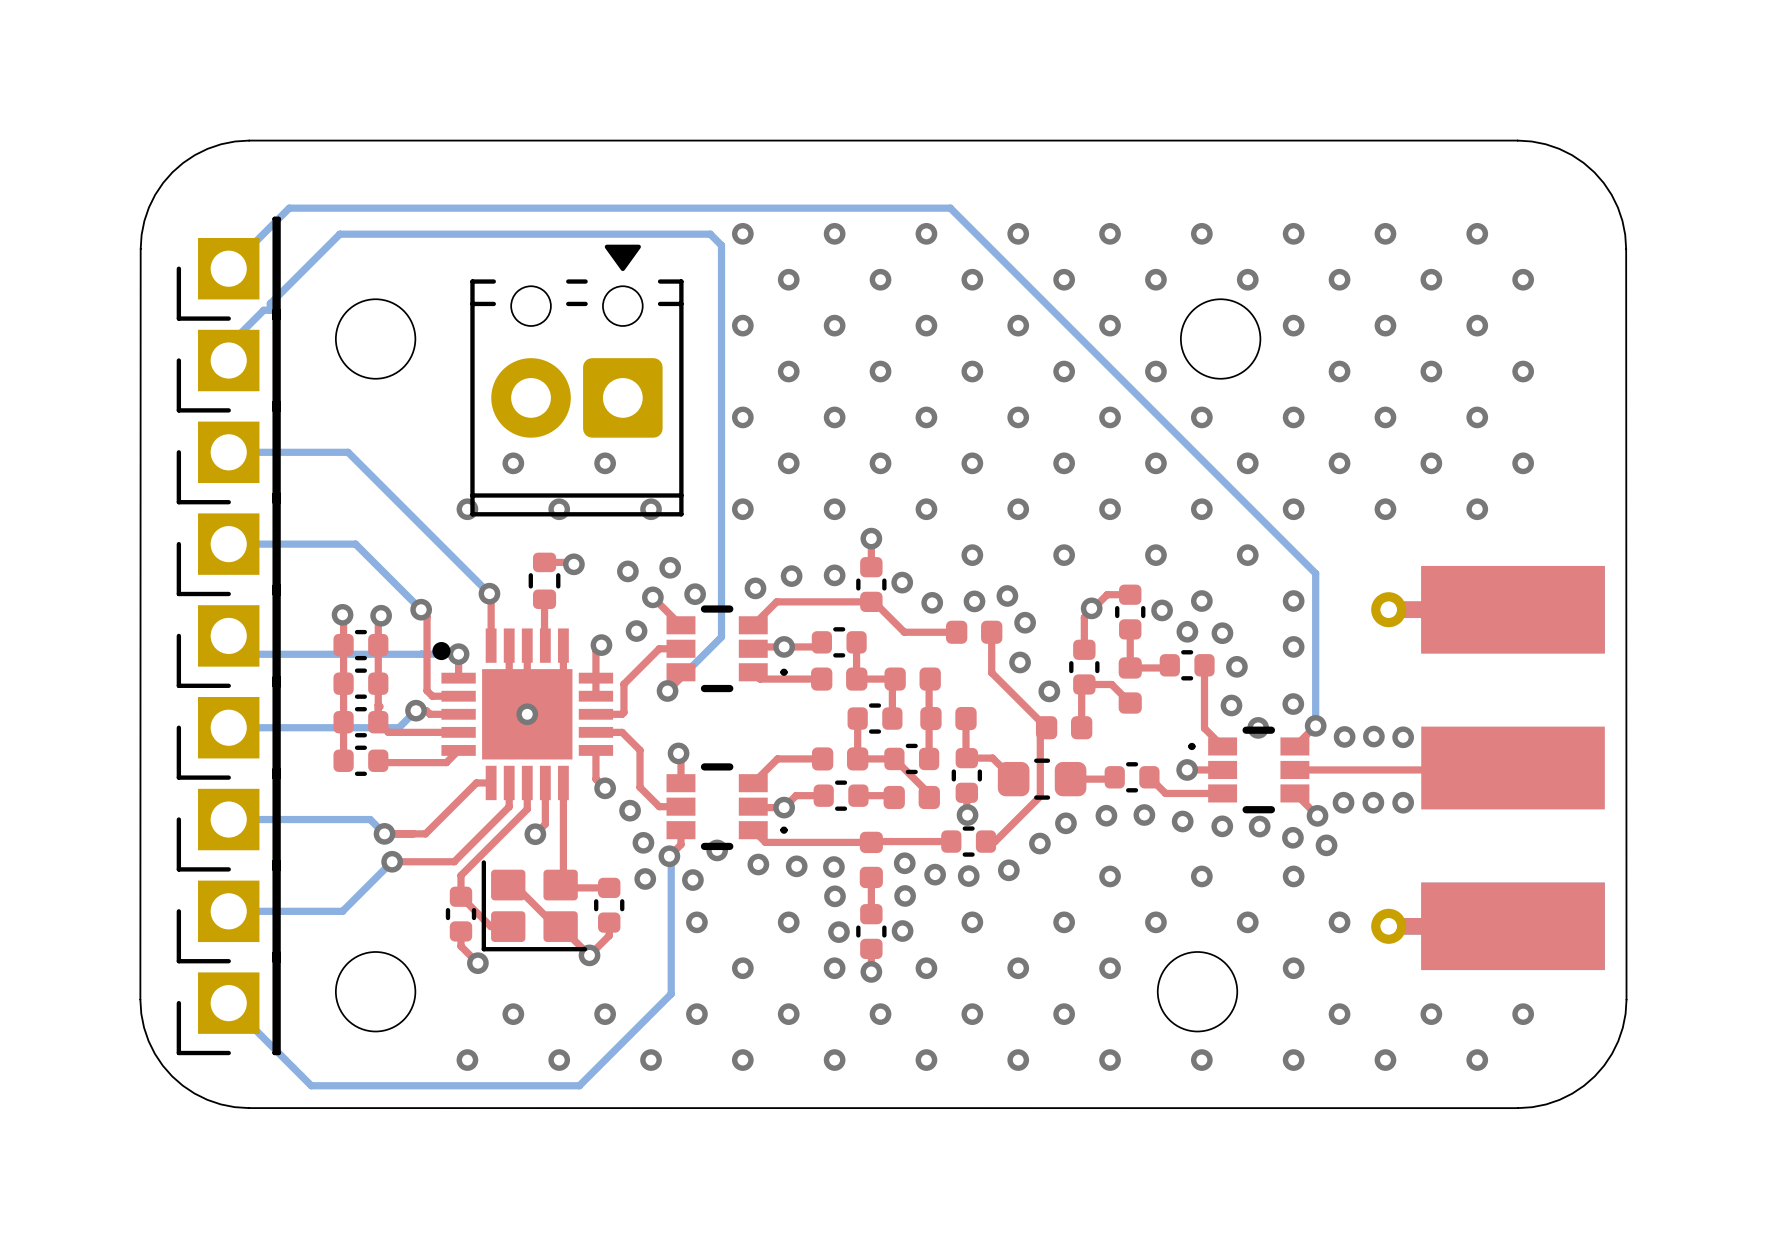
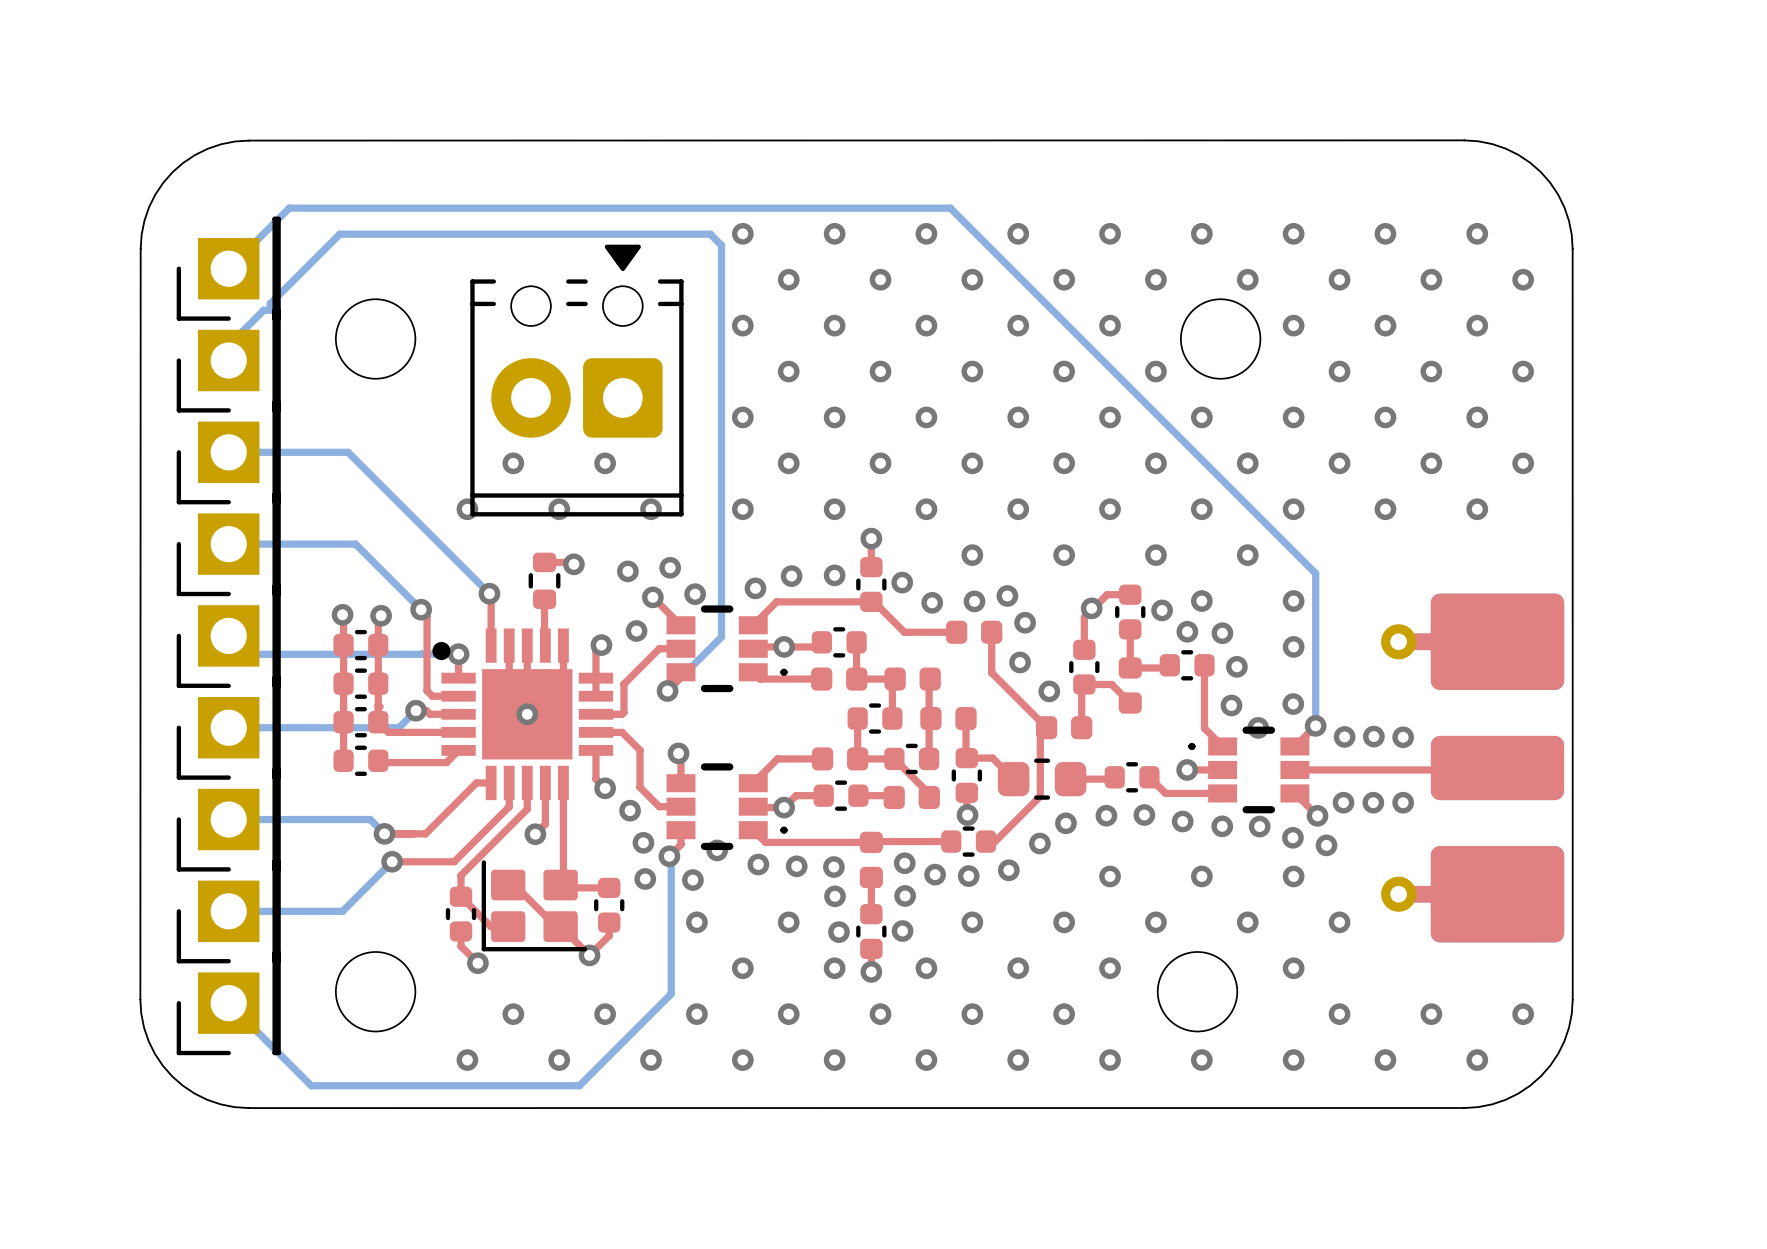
board edge: (249, 140) (1517, 140) (1545, 144) (1571, 155) (1594, 172) (1611, 194) (1622, 220) (1626, 249) (1626, 999) (1622, 1027) (1618, 1041) (1604, 1065) (1584, 1085) (1572, 1093) (1546, 1104) (1532, 1107) (248, 1108) -> (249, 140) (1464, 140) (1492, 144) (1518, 154) (1540, 172) (1558, 194) (1568, 220) (1572, 248) (1572, 999) (1569, 1027) (1558, 1053) (1550, 1065) (1540, 1076) (1518, 1093) (1492, 1104) (1478, 1107) (248, 1108)
part footprint: [1371, 565, 1605, 971] -> [1381, 593, 1565, 943]

